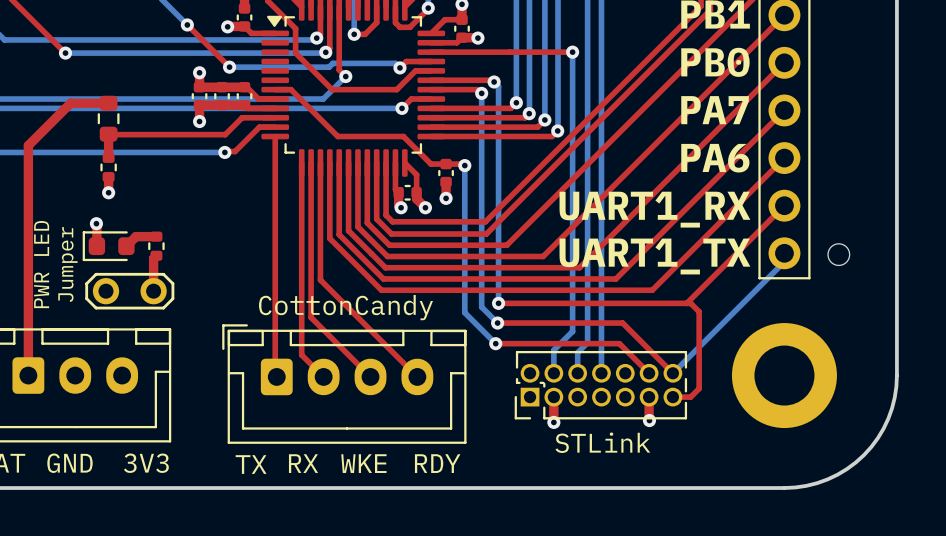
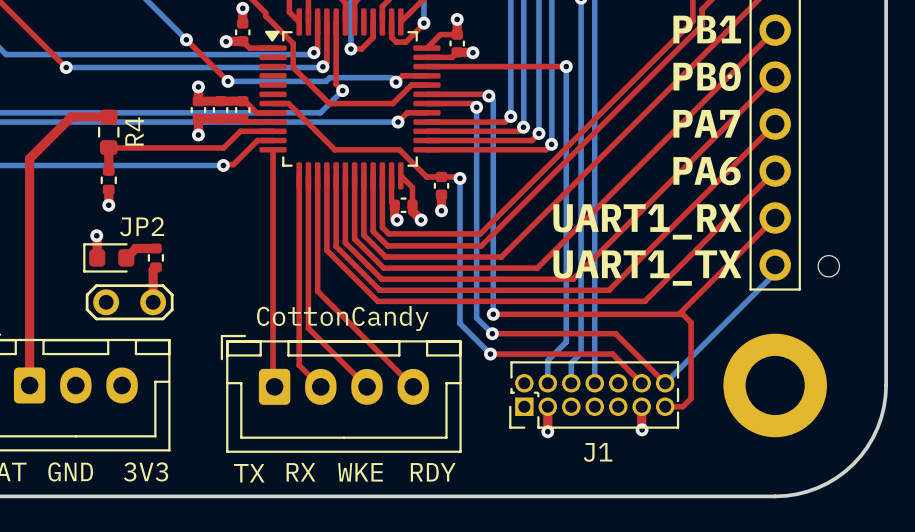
R4 name: none -> R4 (134, 131)
JP2 name: none -> JP2 (142, 226)
text: PWR LED (41, 264) -> none
text: Jumper (67, 264) -> none
STLink name: STLink (602, 442) -> J1 (598, 452)

